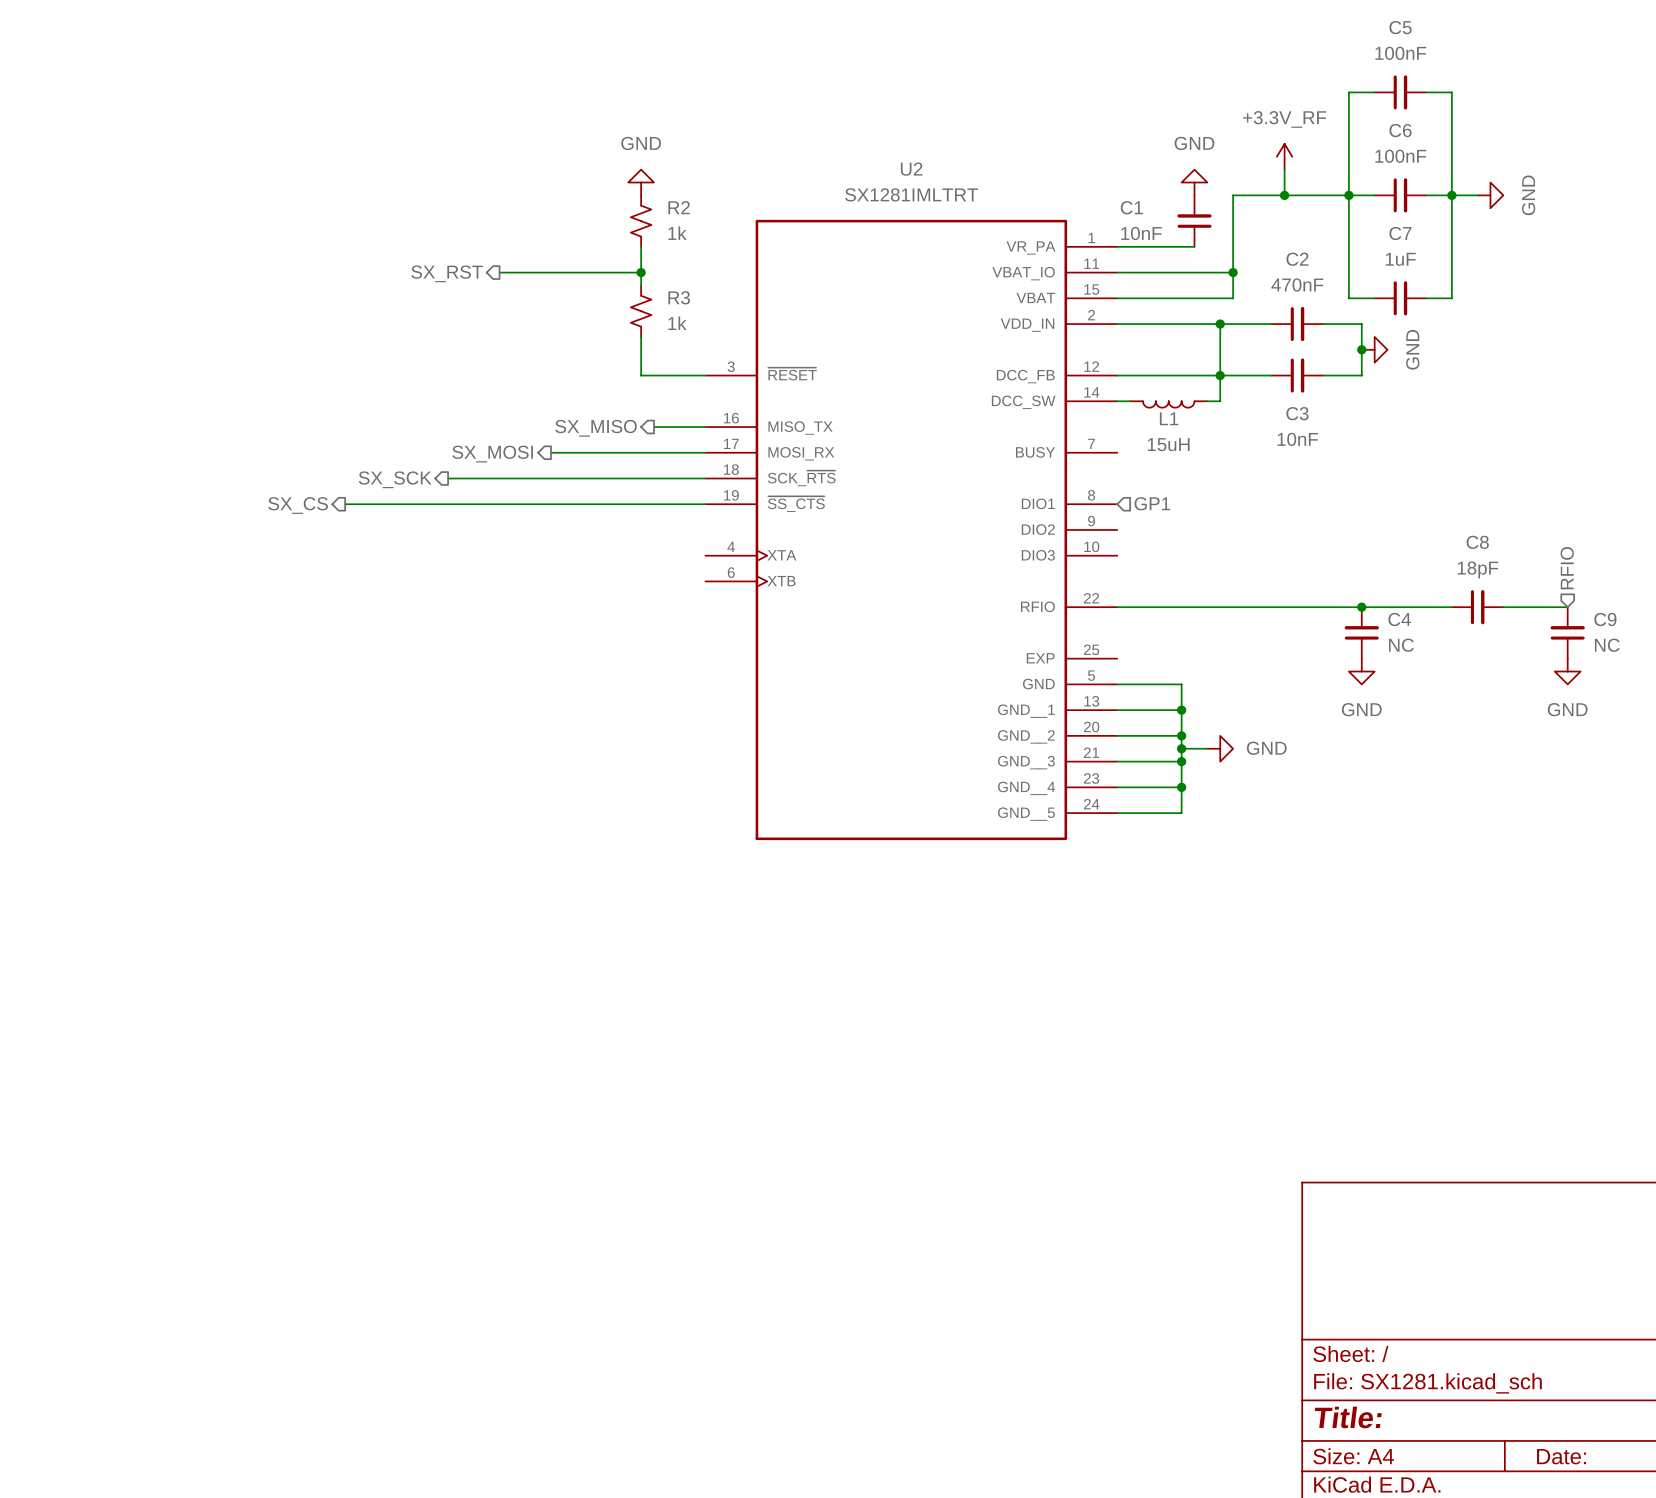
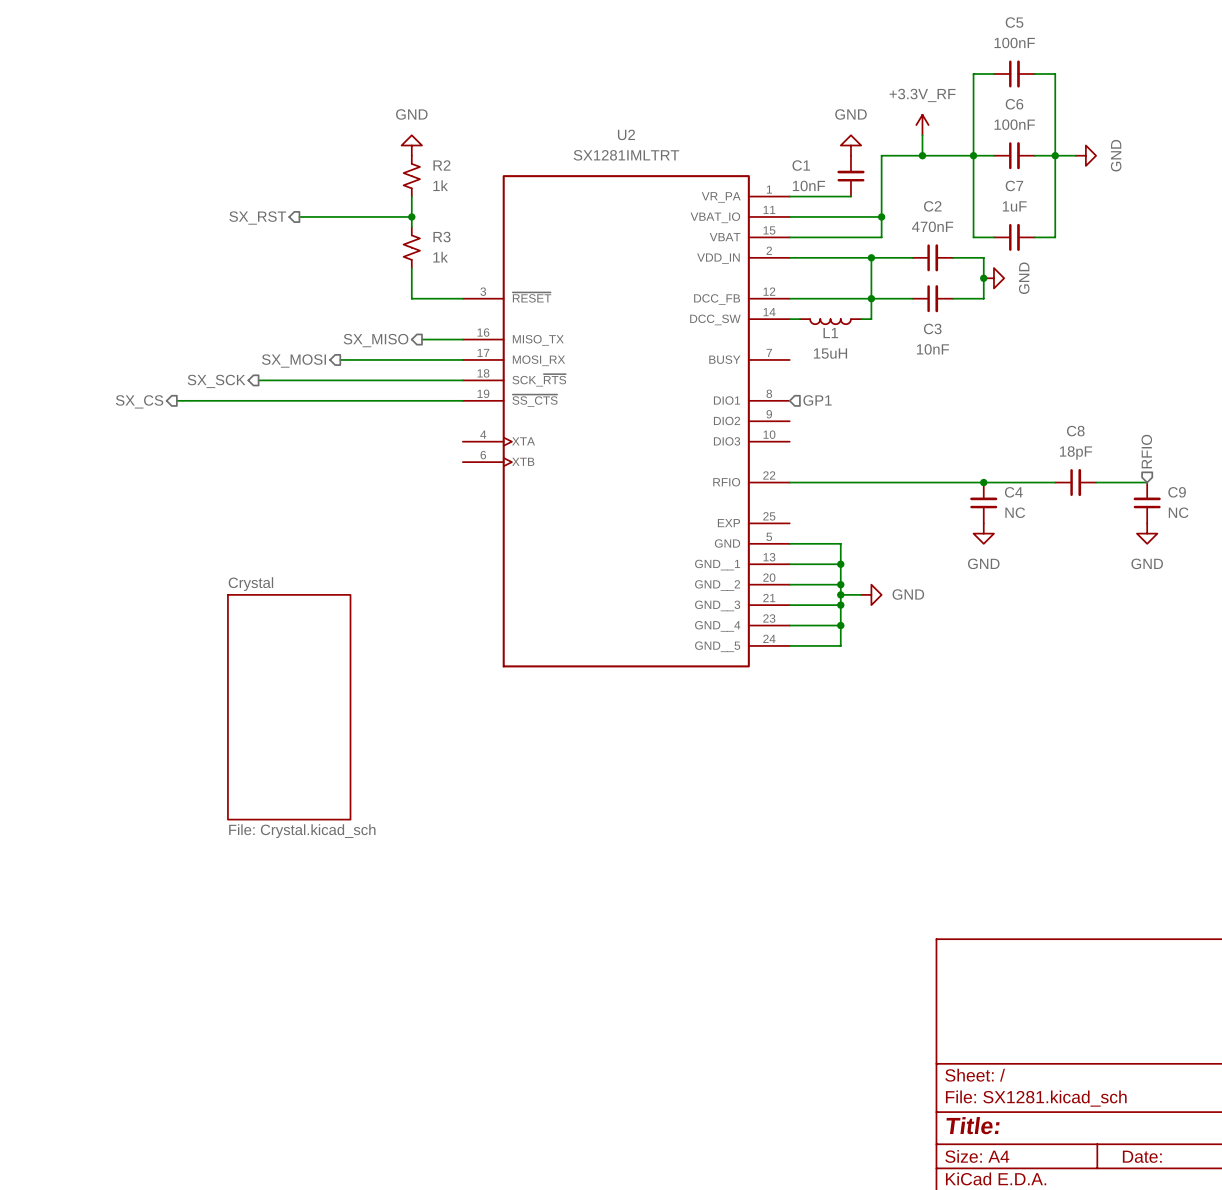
sheet Crystal: none -> File: Crystal.kicad_sch (289, 707)

